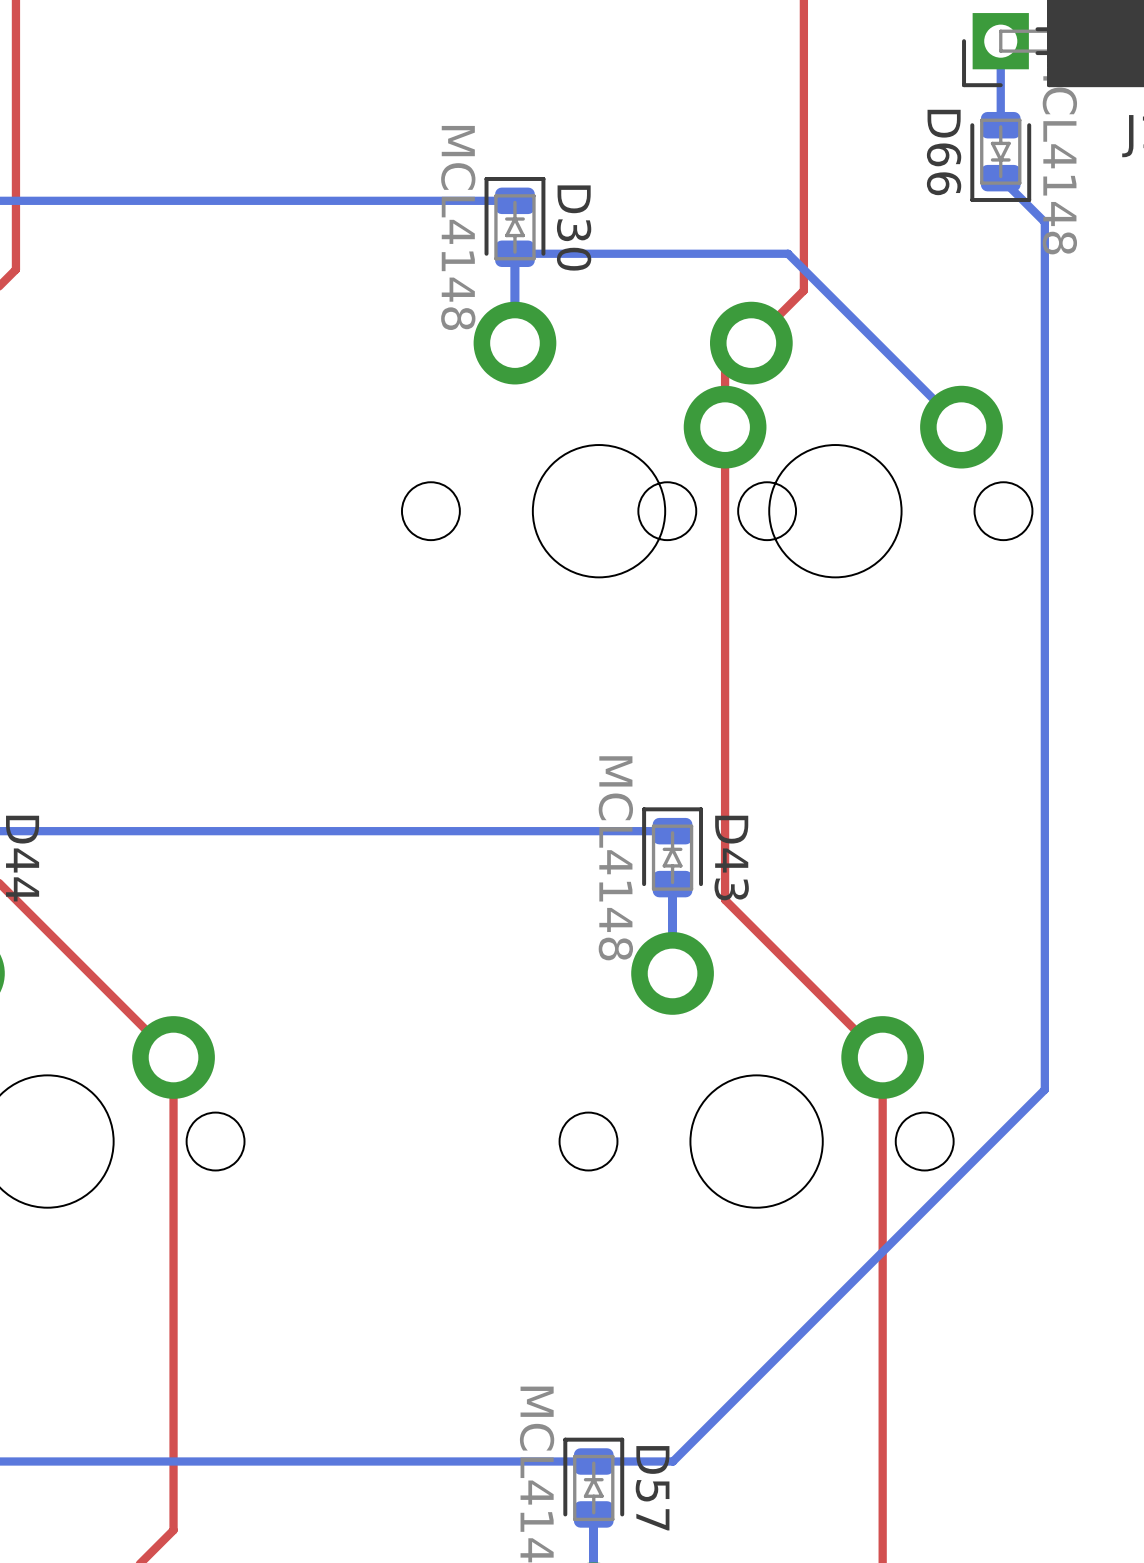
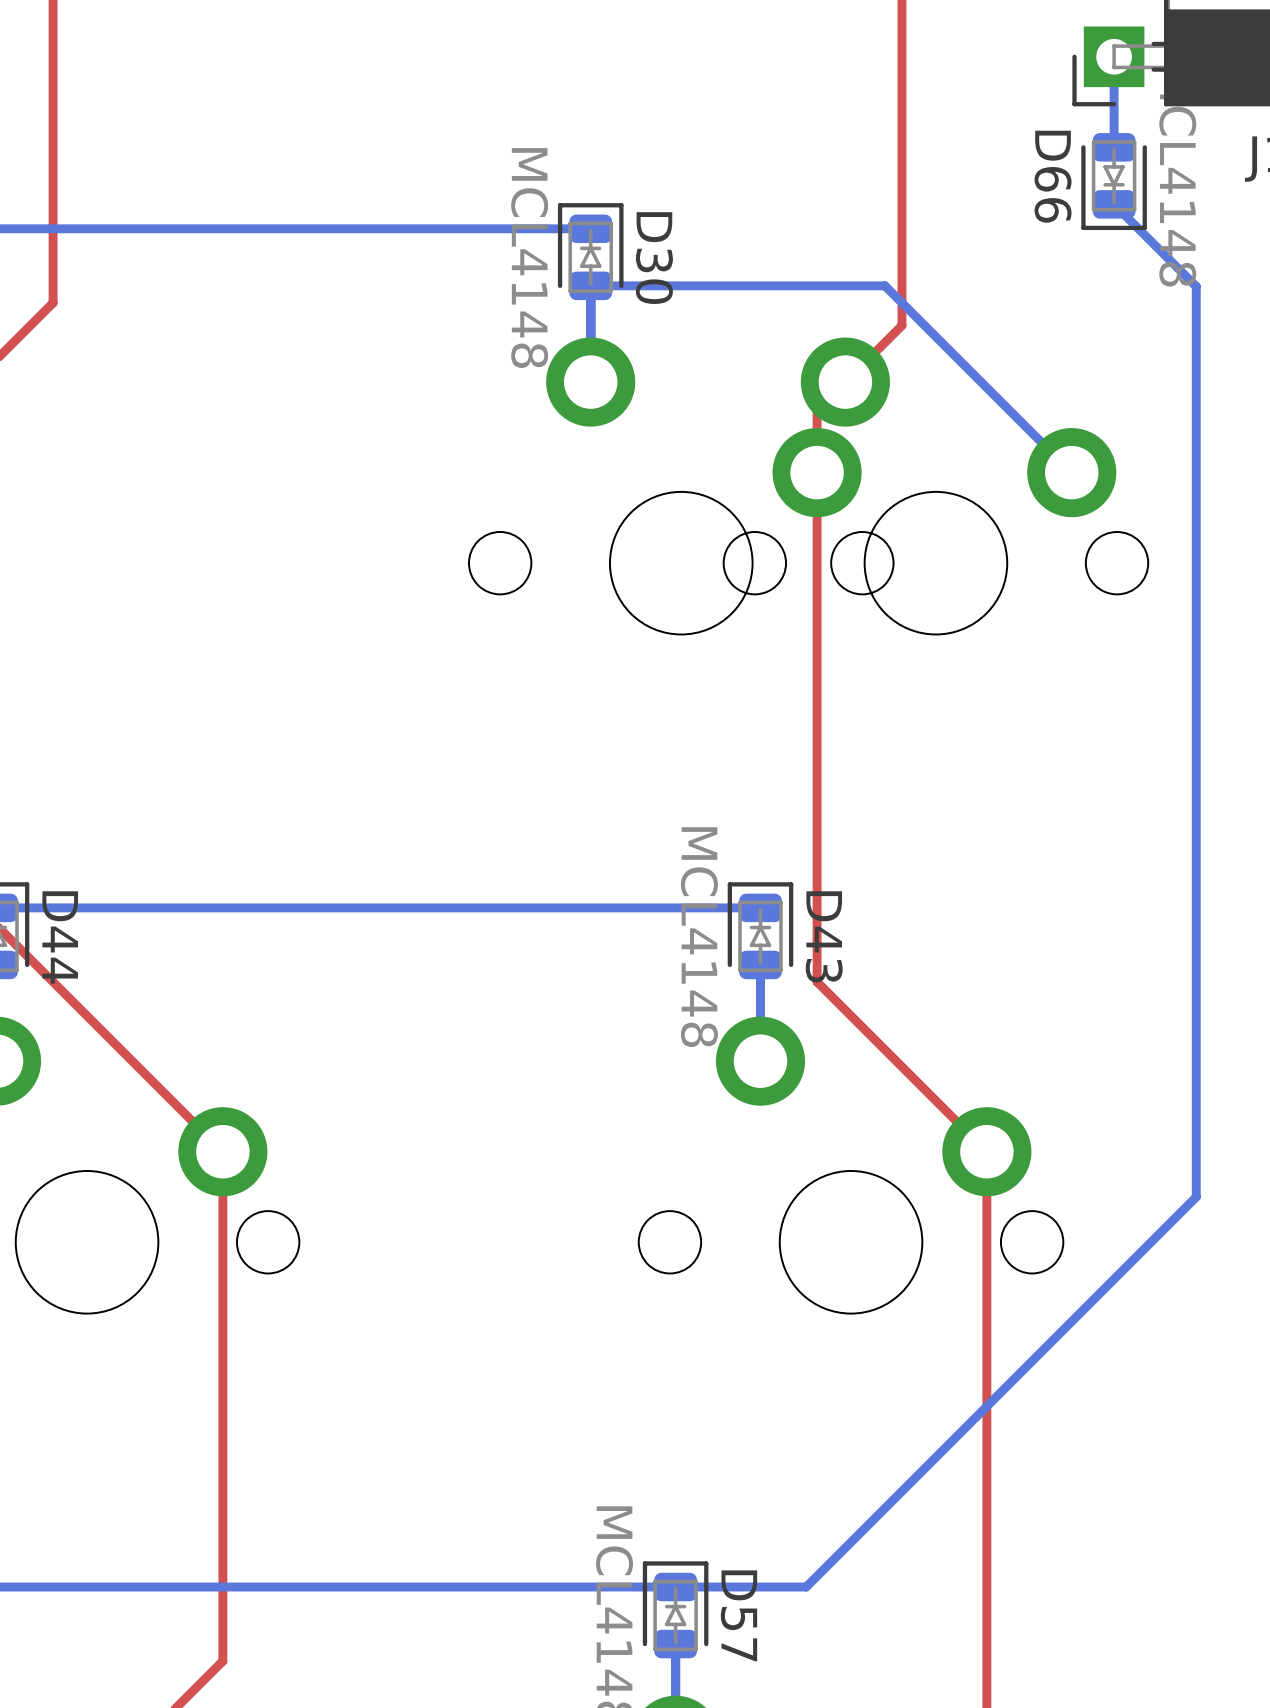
bottom track: (1044, 222) (1044, 1089) (673, 1461) -> (1161, 251) (1196, 286) (1196, 1197) (806, 1587) (760, 1587)

